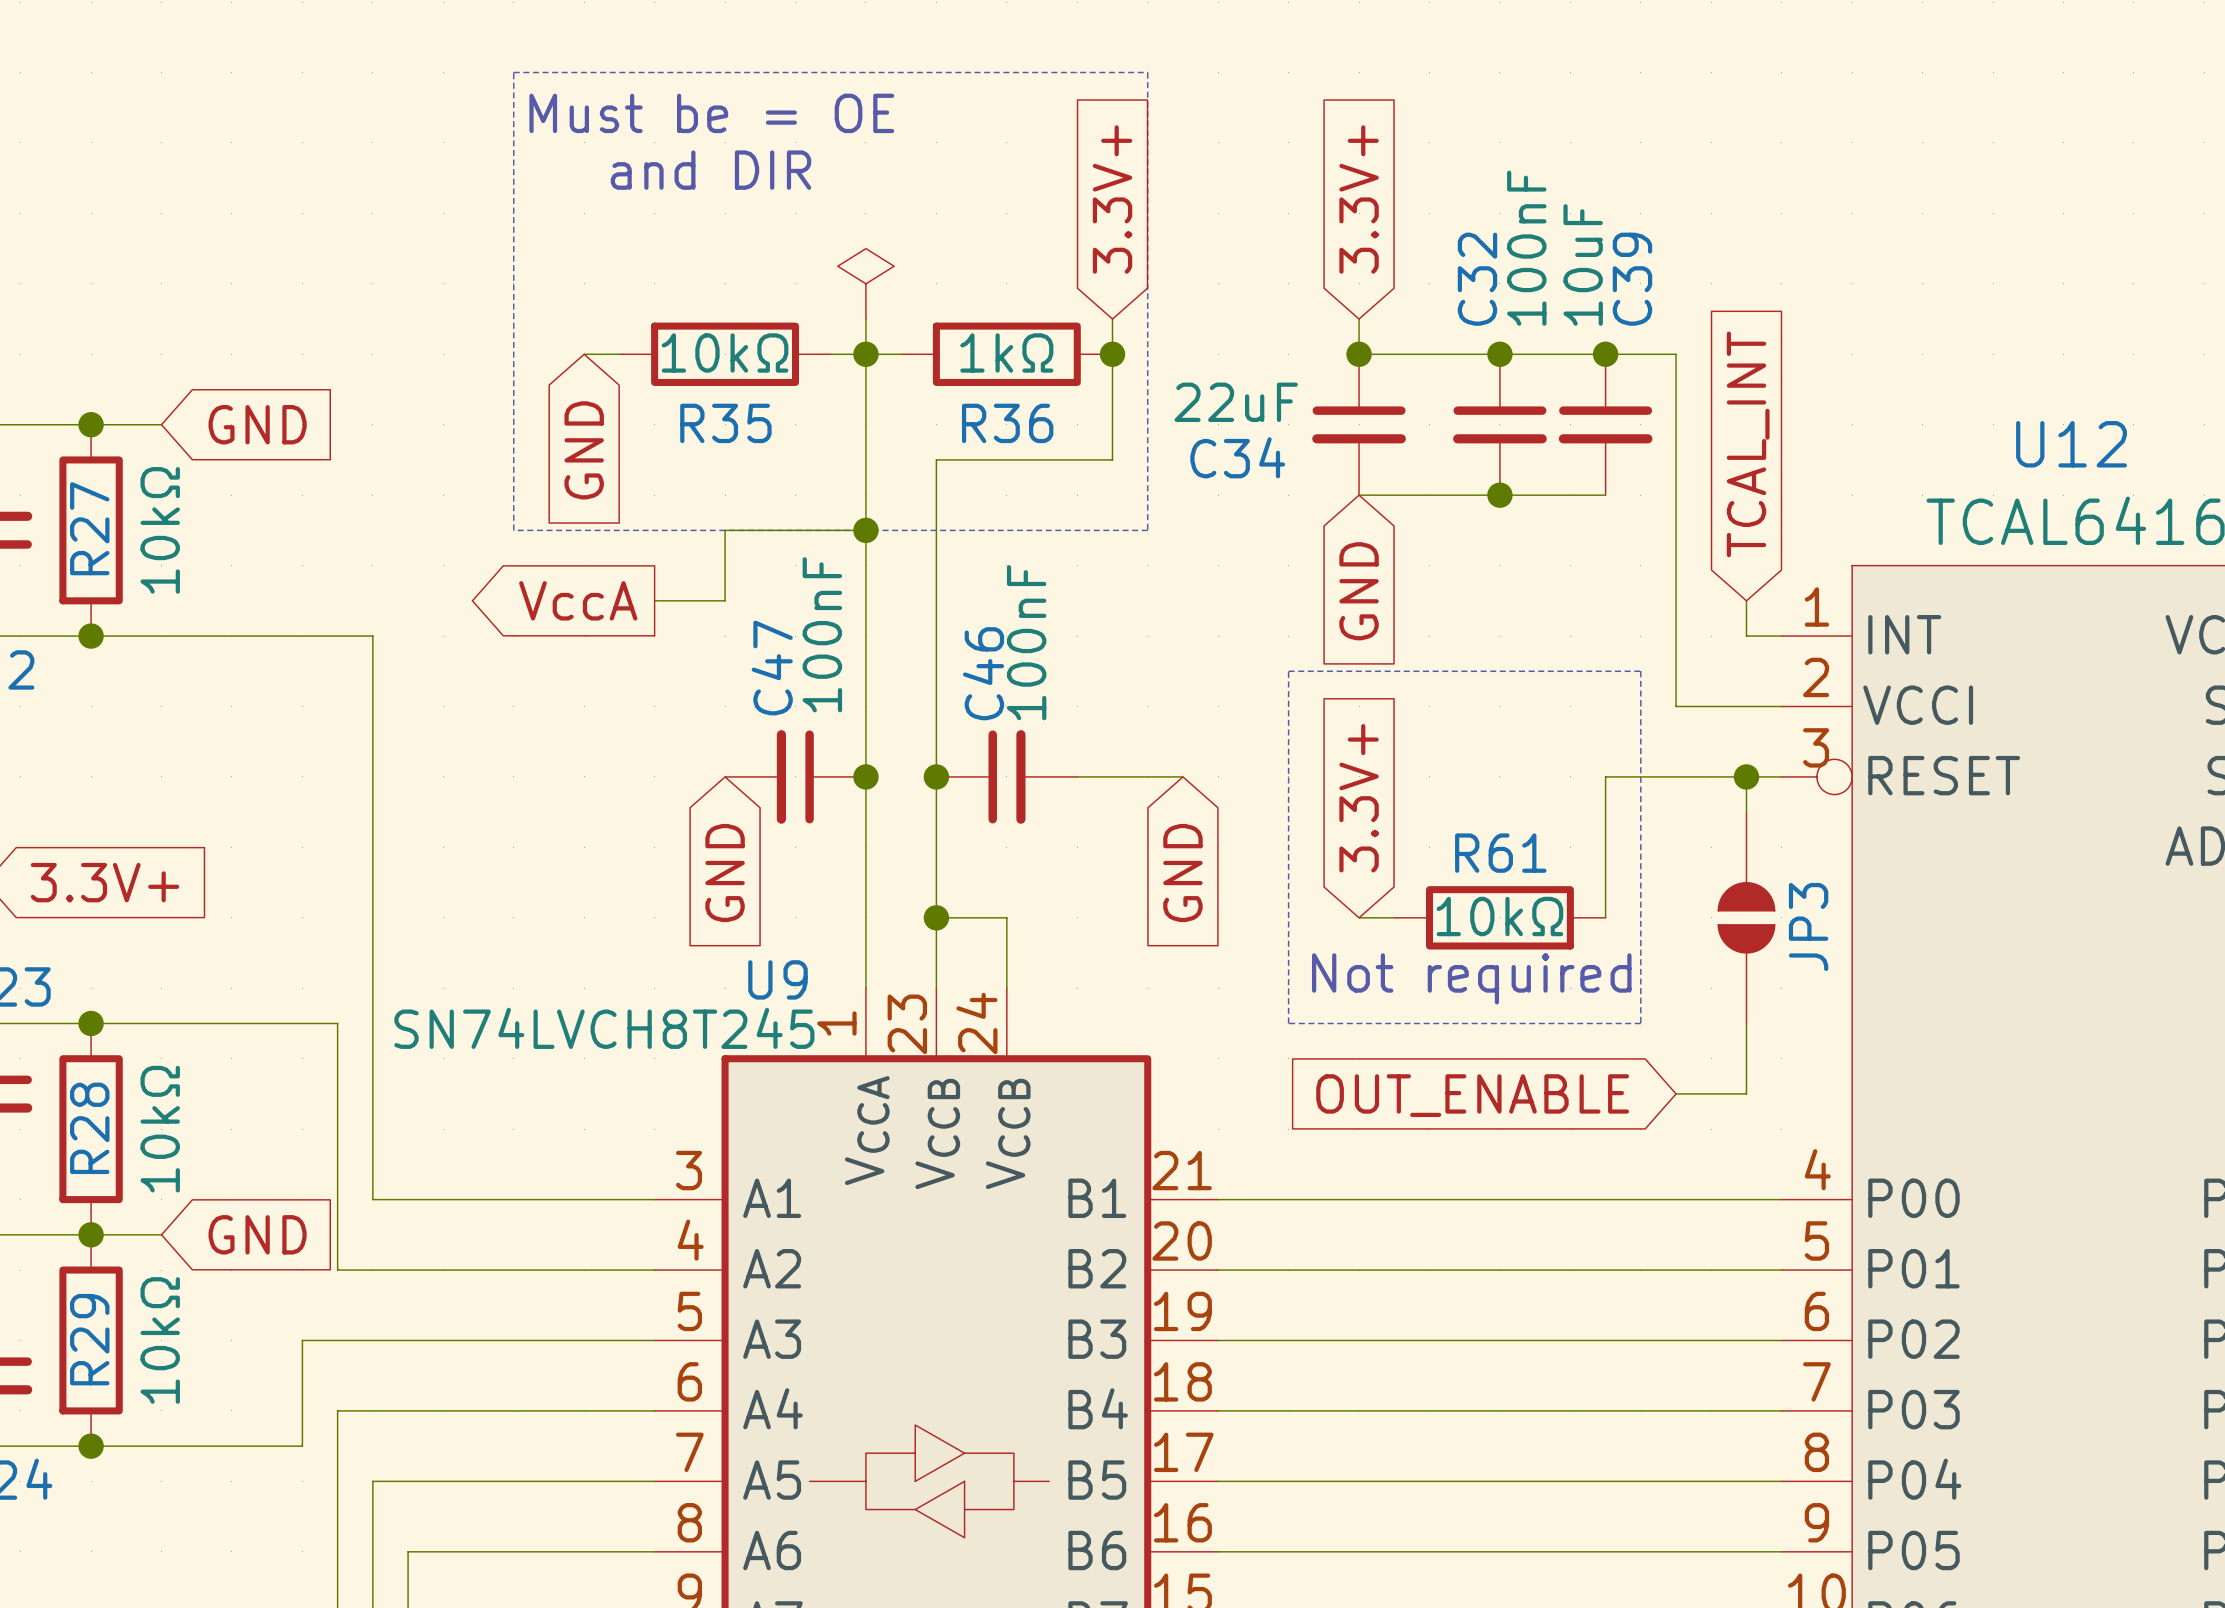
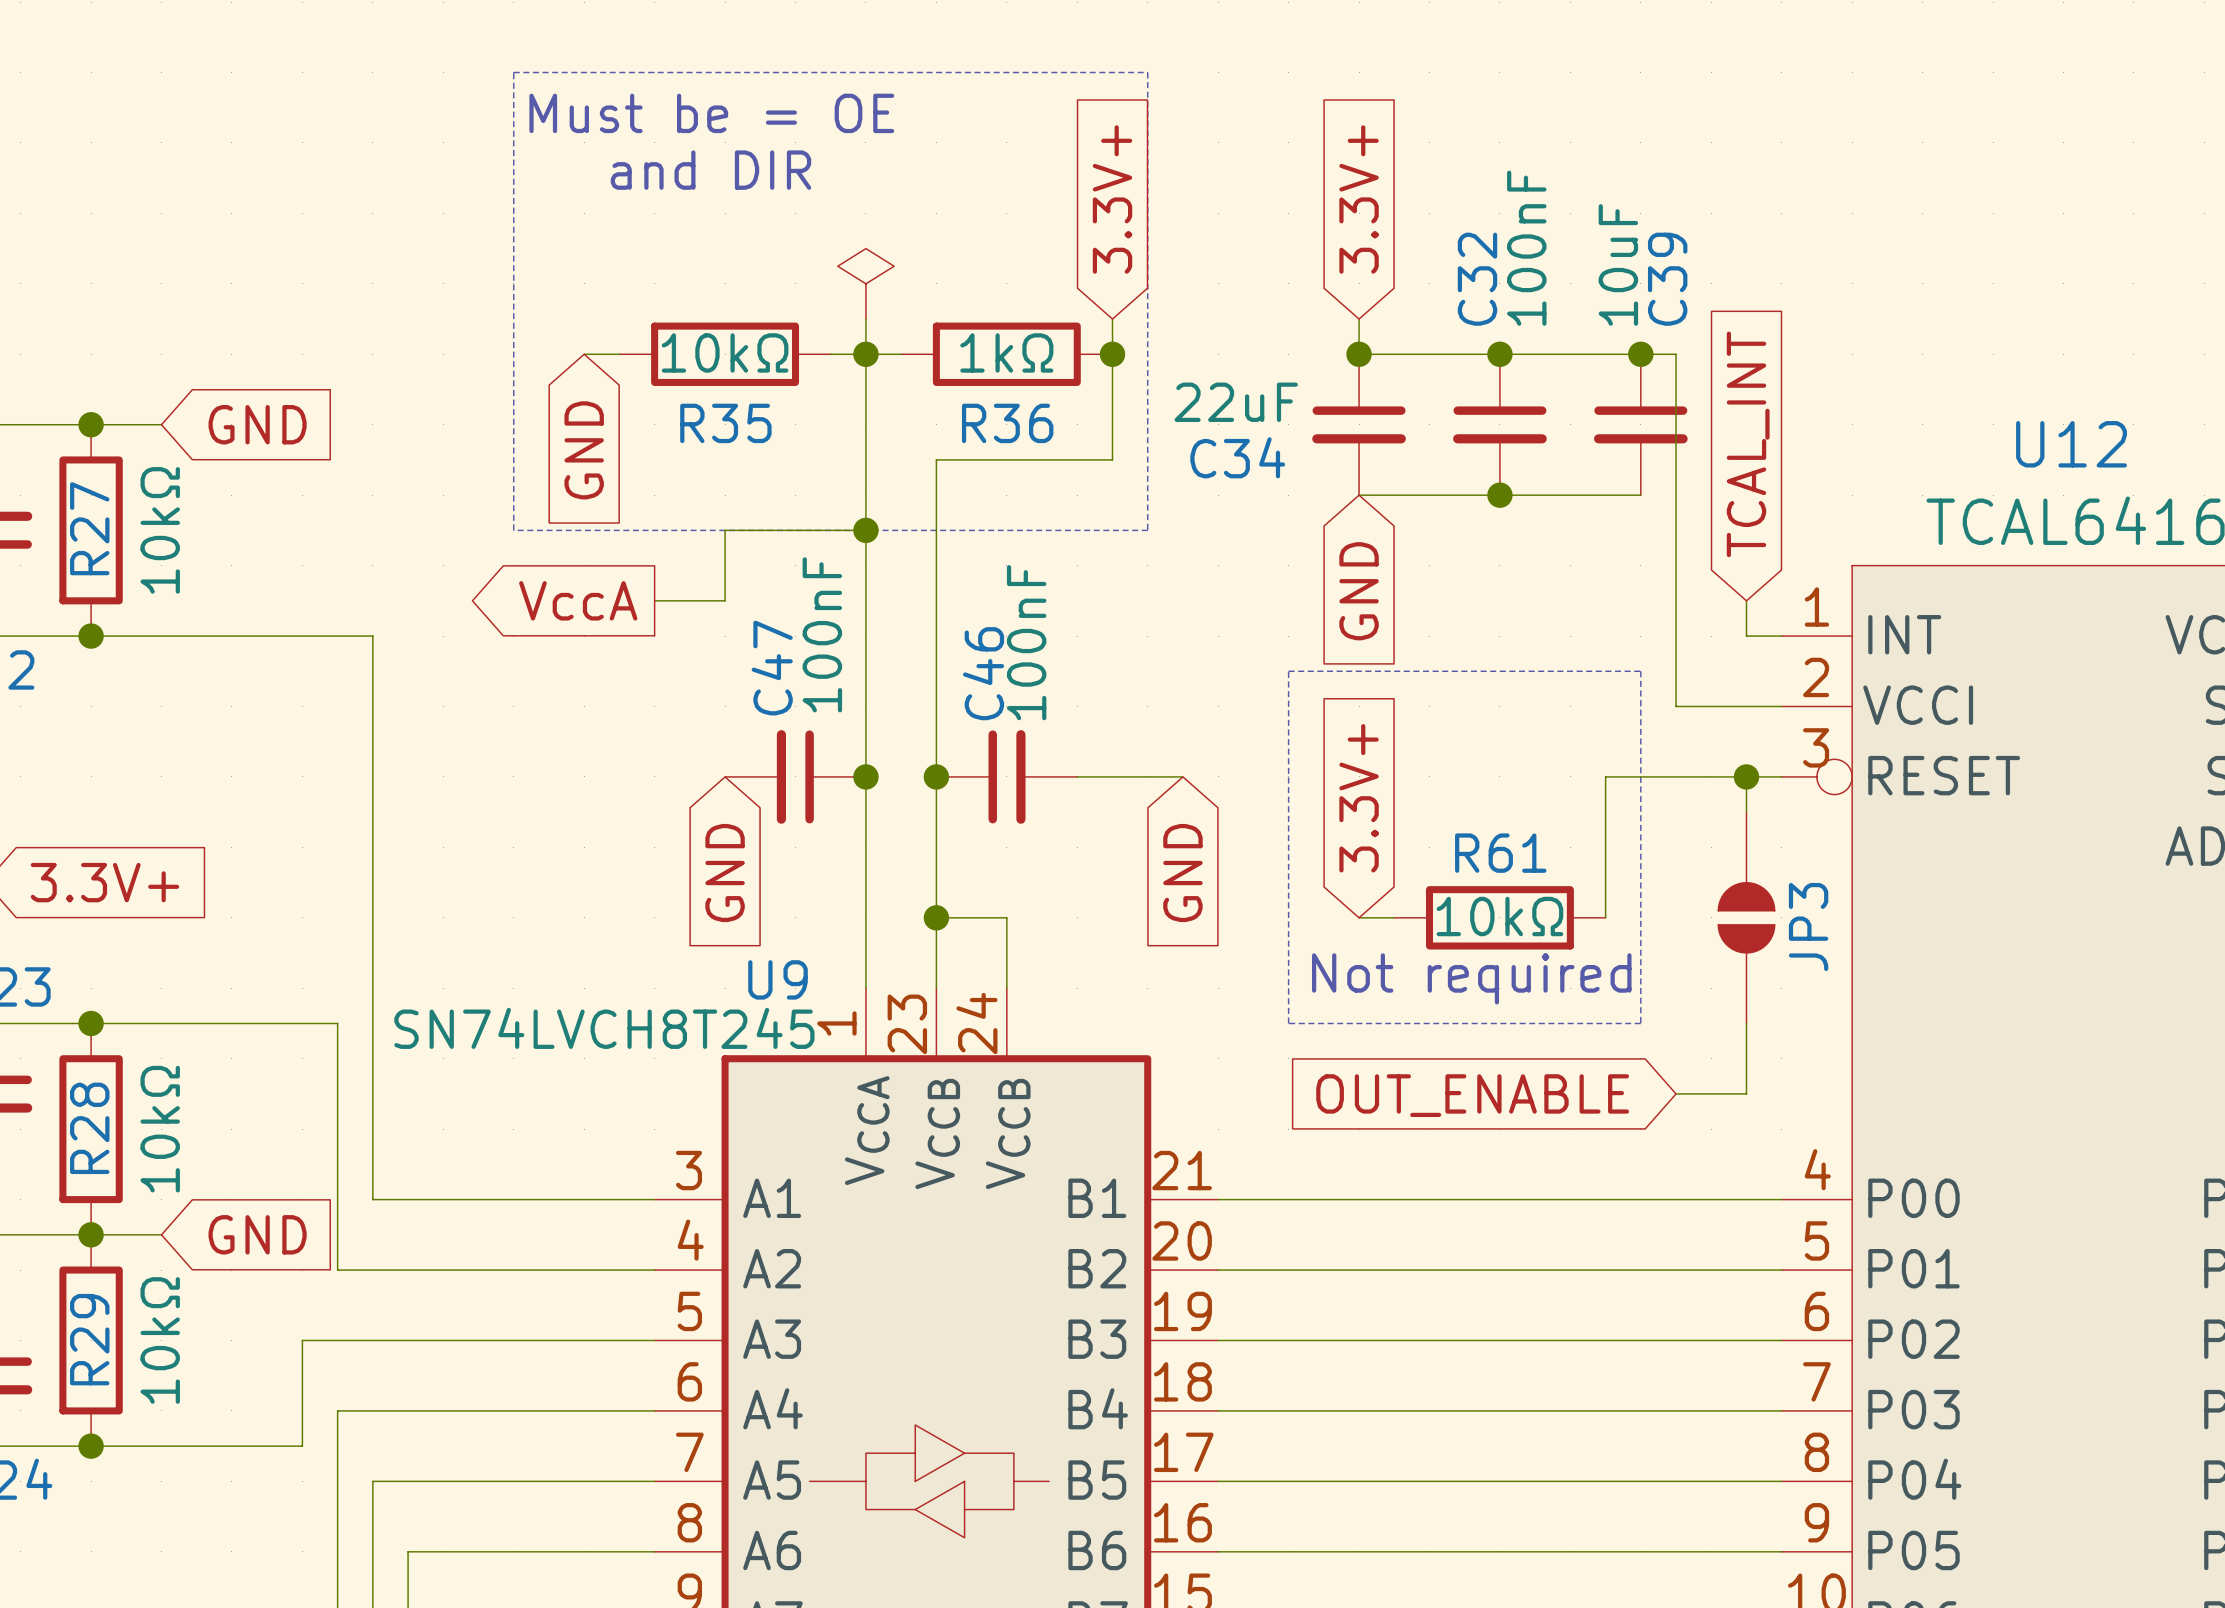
junction position: (1605, 354) -> (1640, 354)
C39 position: (1605, 424) -> (1640, 424)
wire: none -> (1605, 495) (1640, 495)

